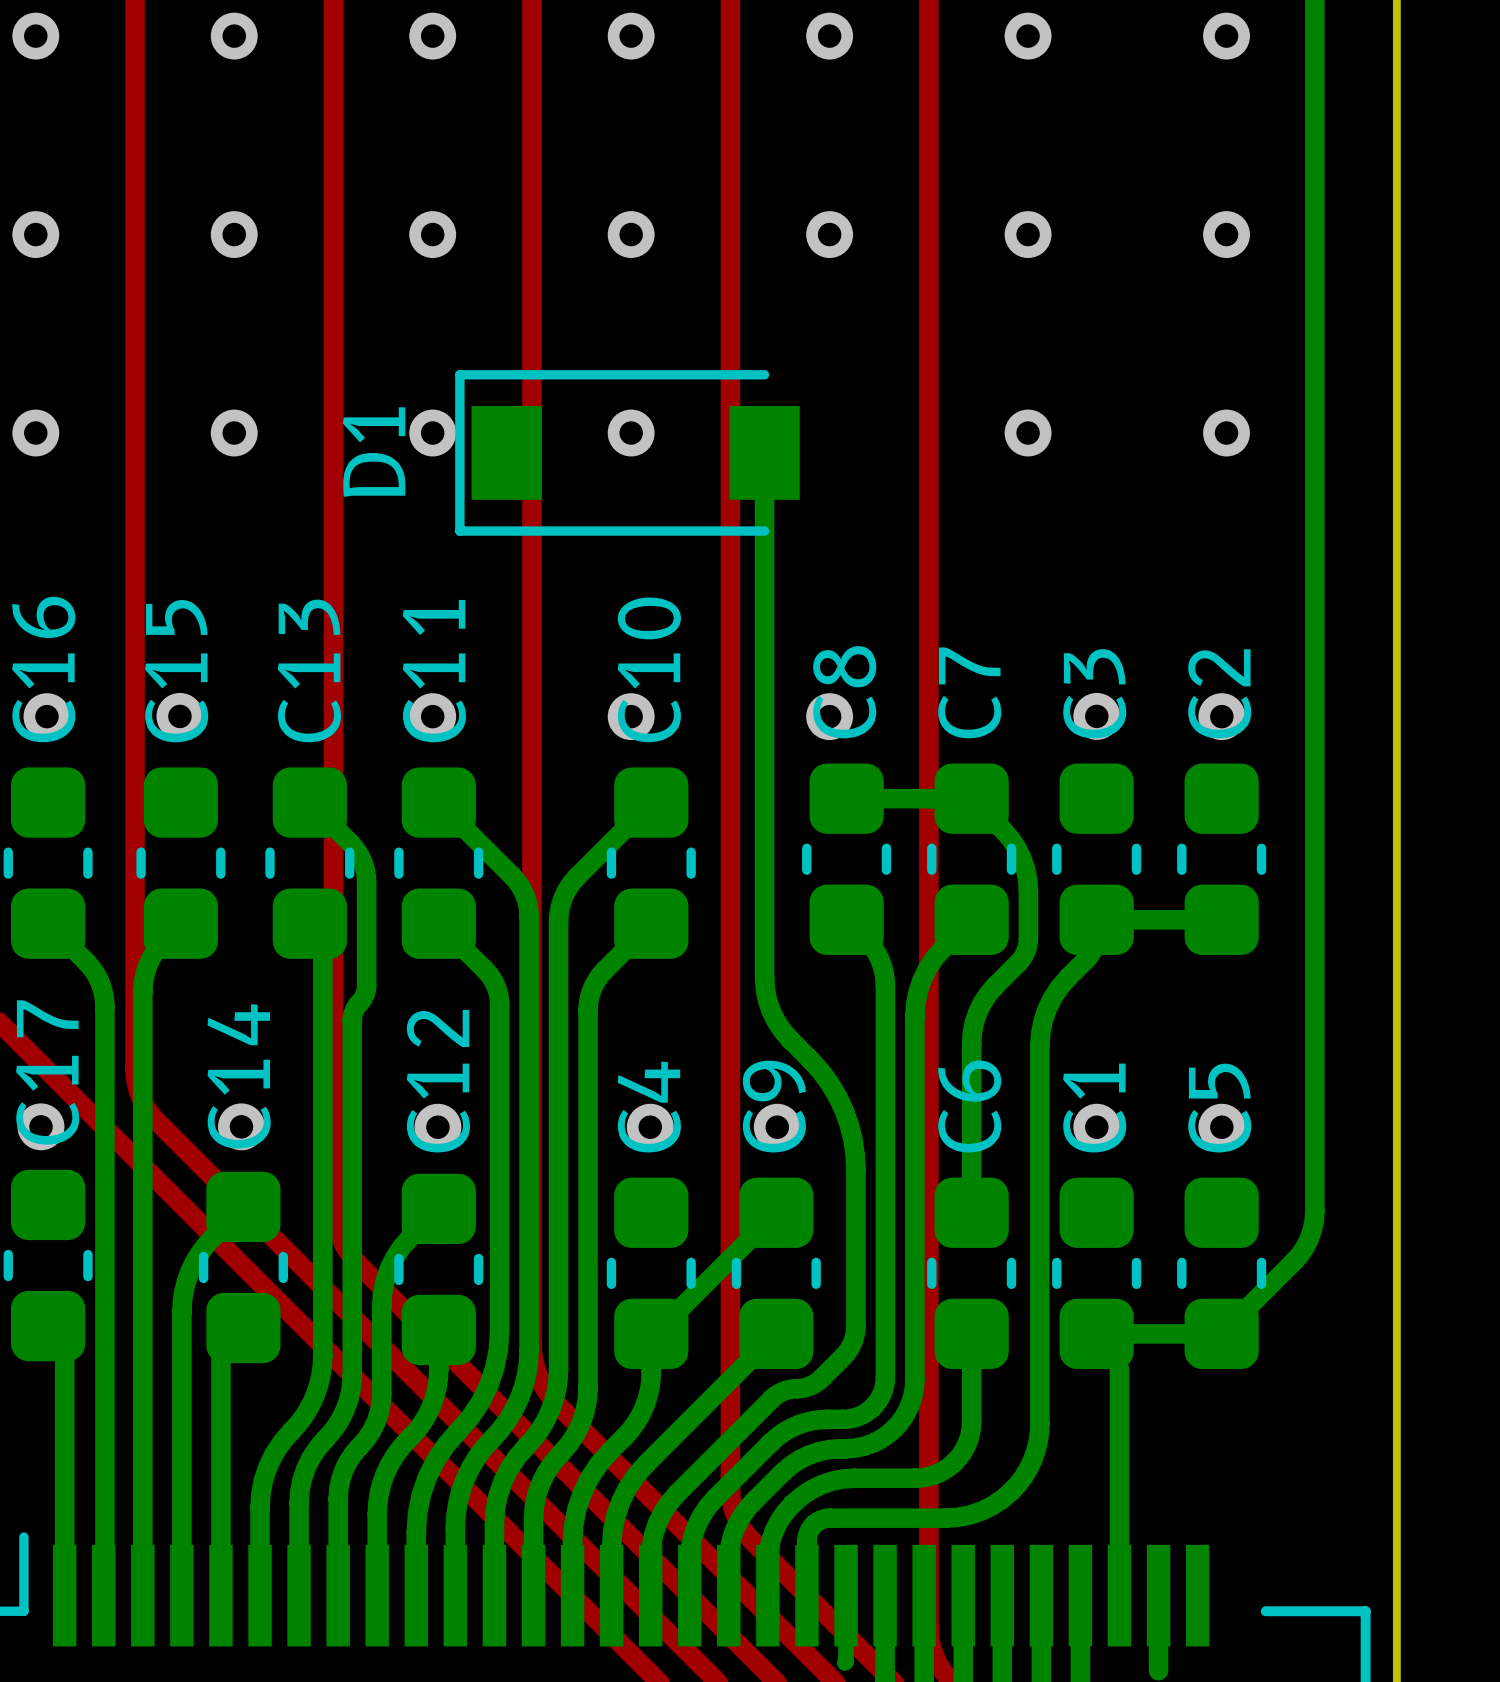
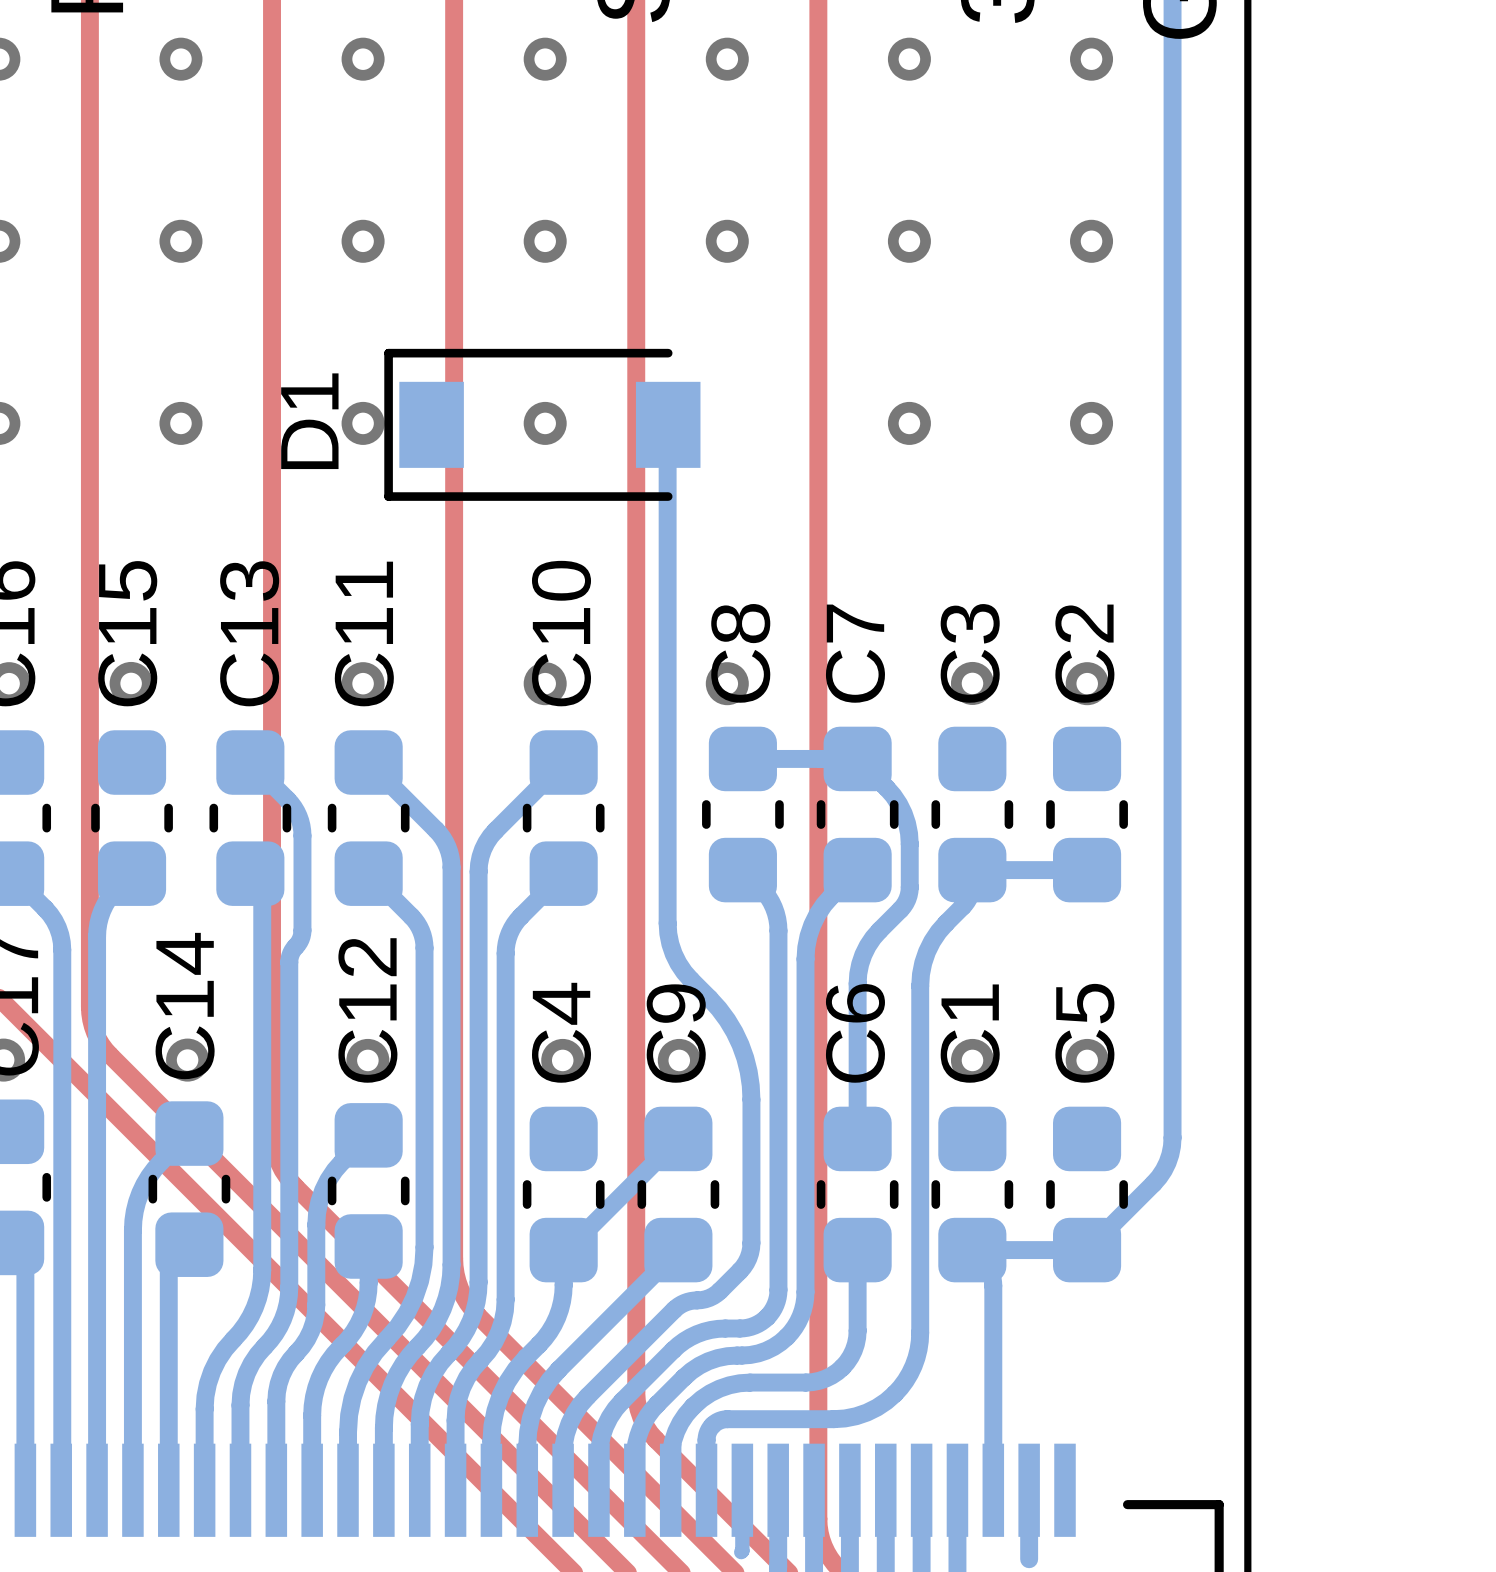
D1 position: (627, 452) -> (542, 424)

